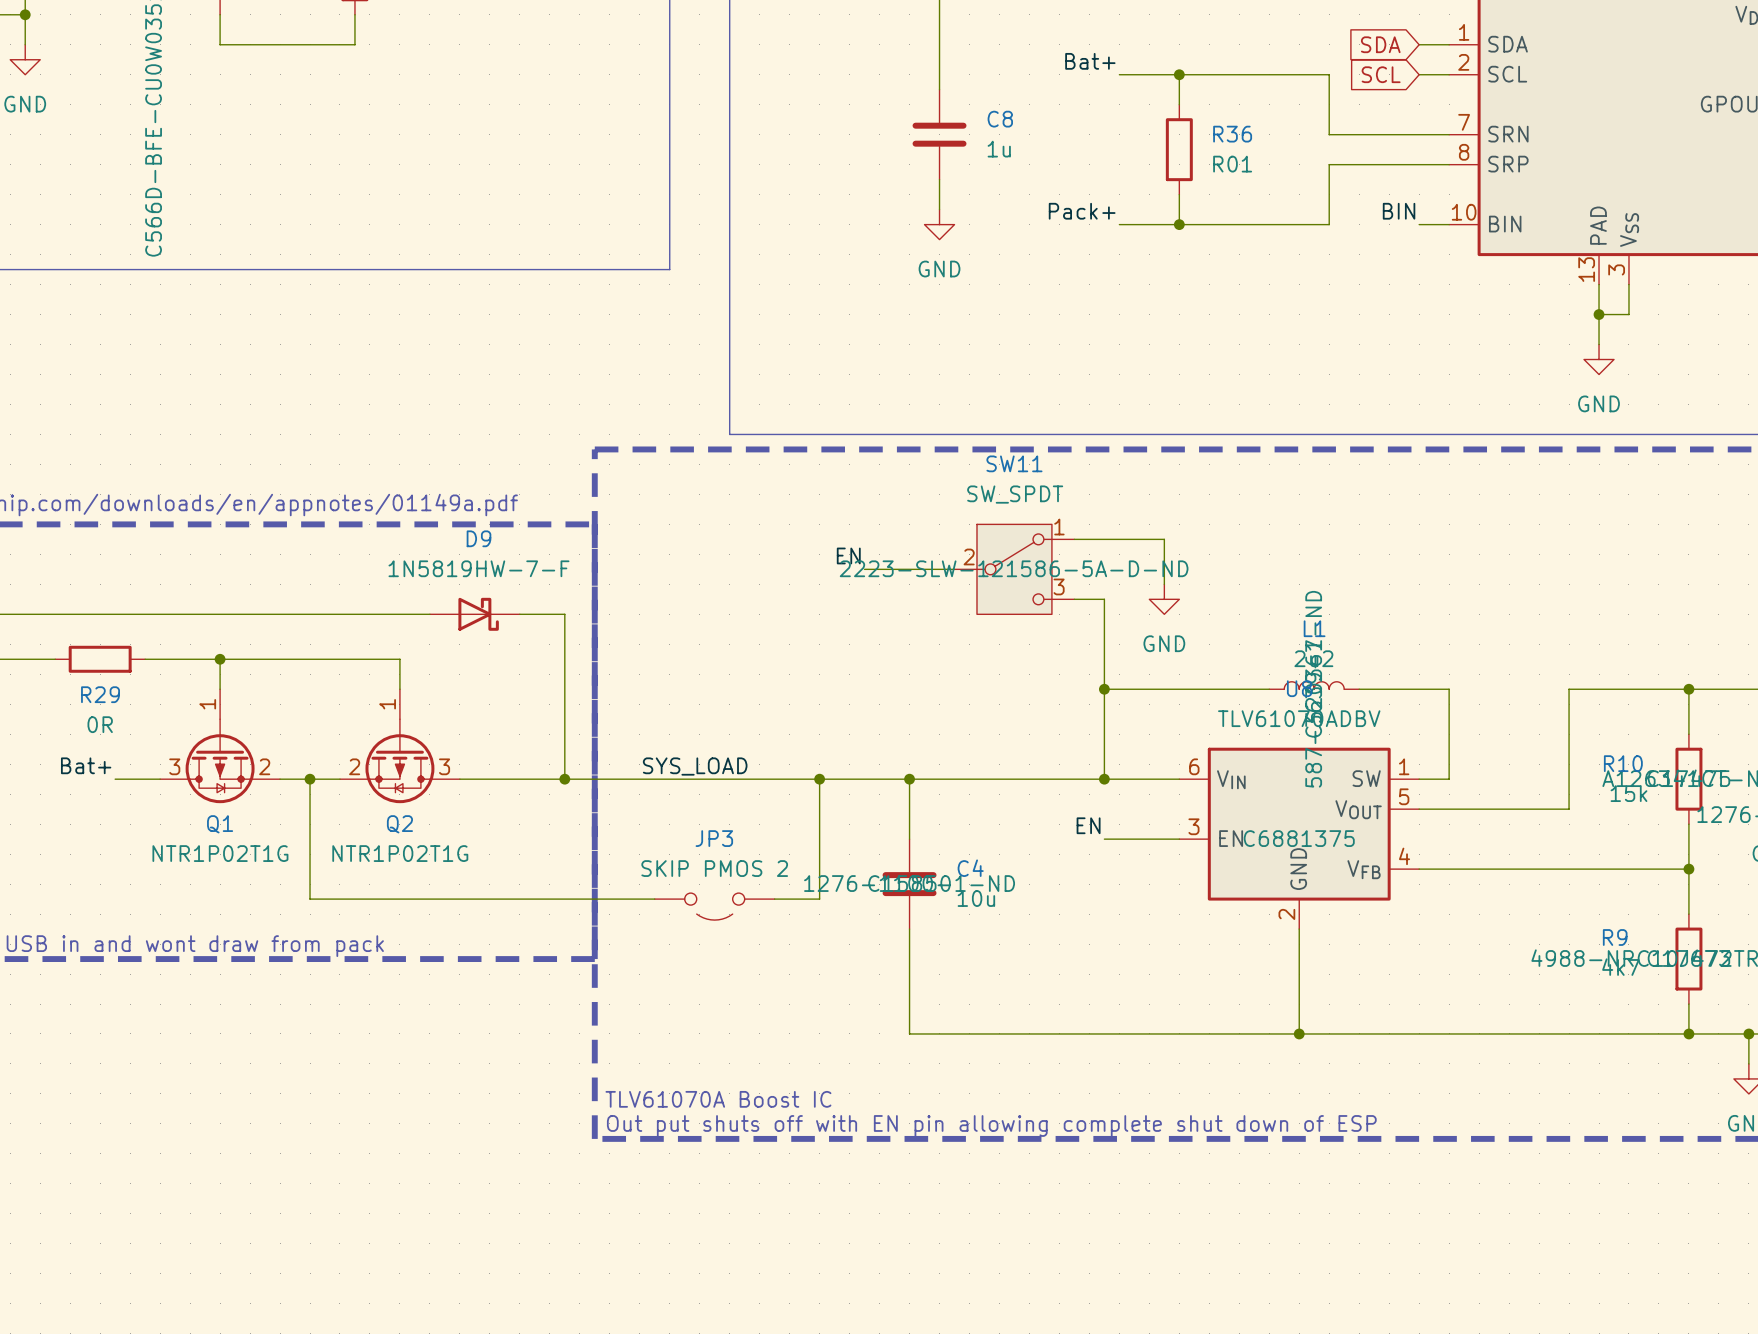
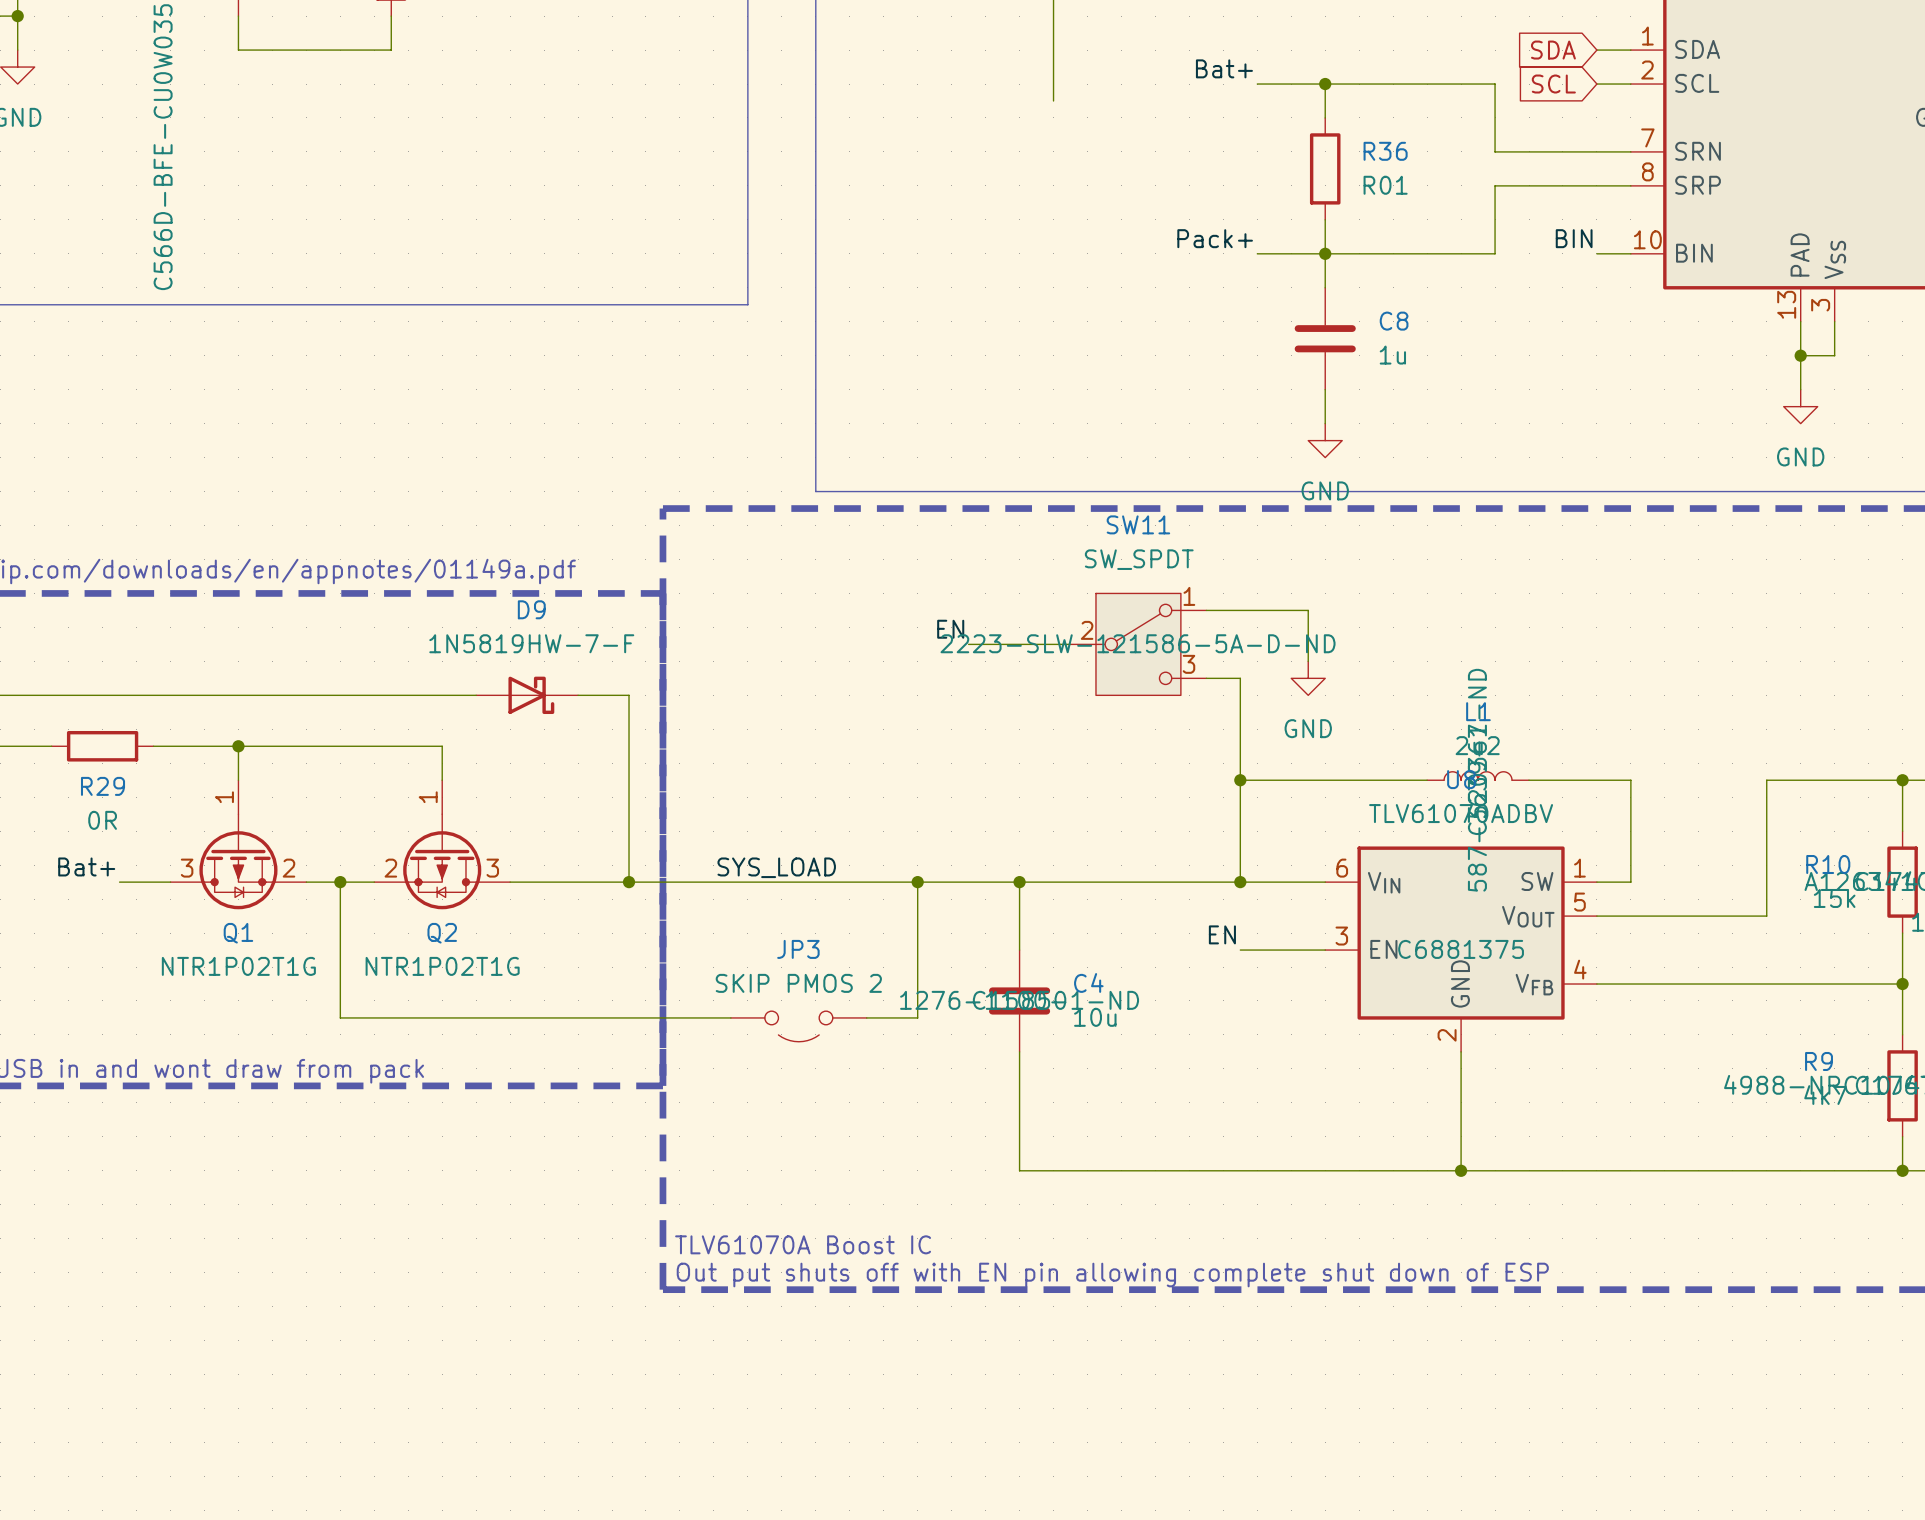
C8 position: (939, 134) -> (1325, 338)
wire: (939, 179) (939, 209) -> (1325, 253) (1325, 287)
power symbol position: GND (939, 224) -> GND (1325, 440)
wire: none -> (1325, 389) (1325, 423)

